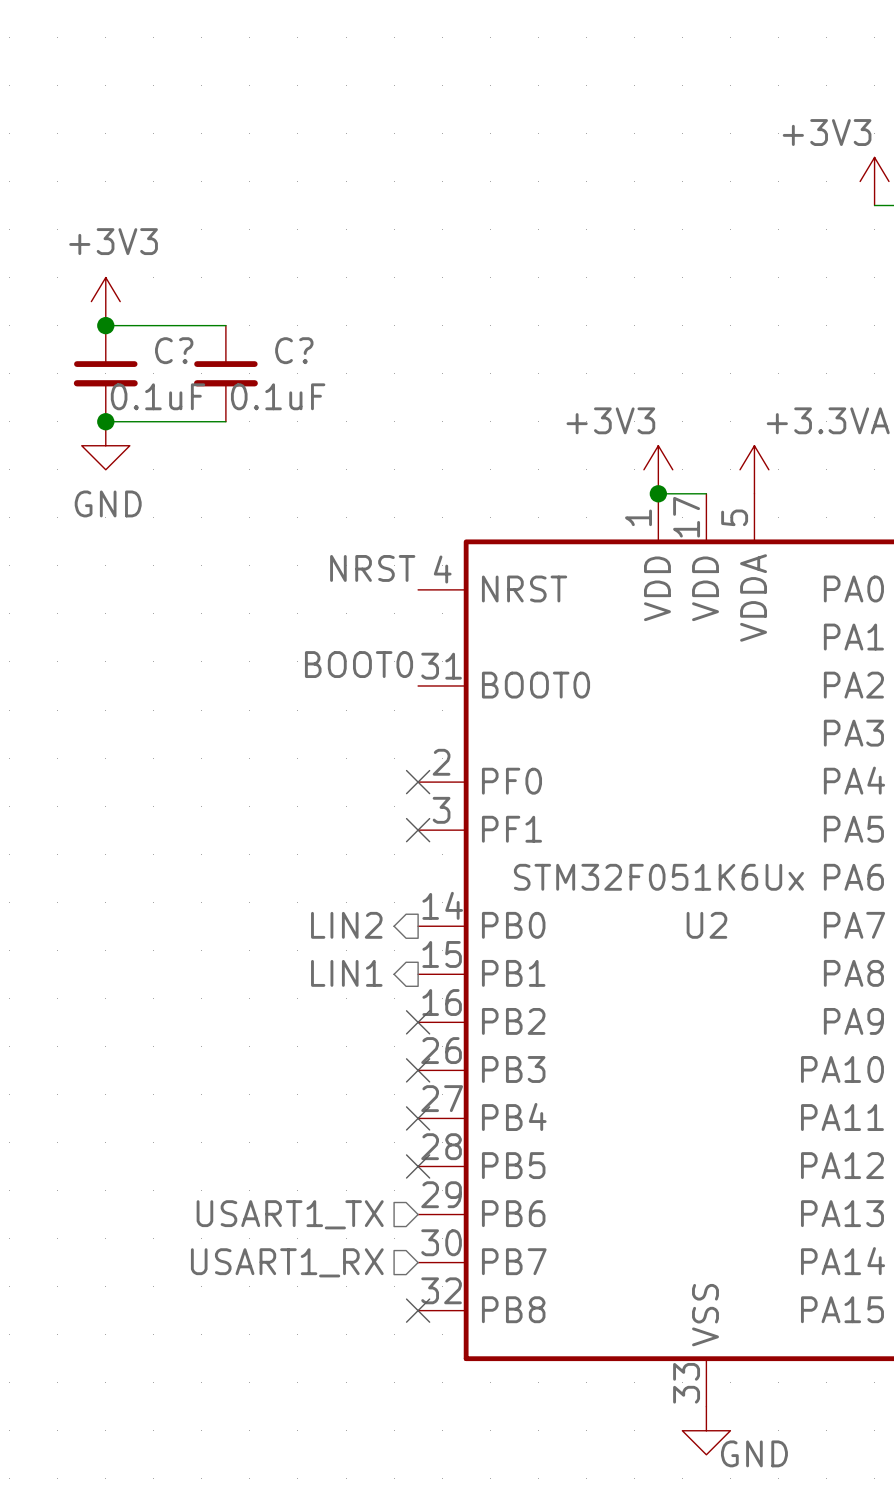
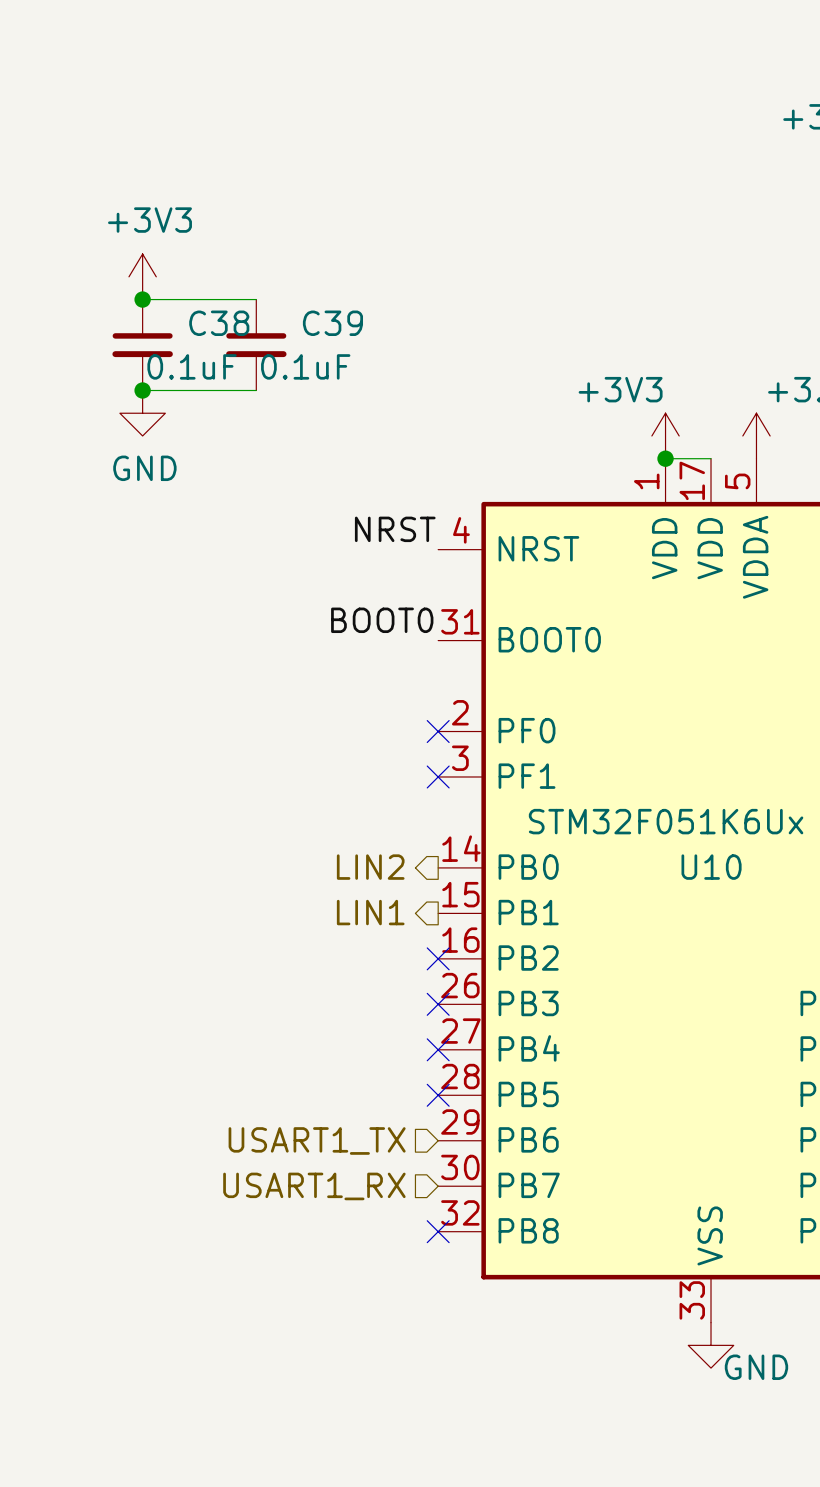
C? name: C? (174, 350) -> C38 (219, 323)
C? name: C? (294, 350) -> C39 (332, 323)
U2 name: U2 (706, 925) -> U10 (711, 867)

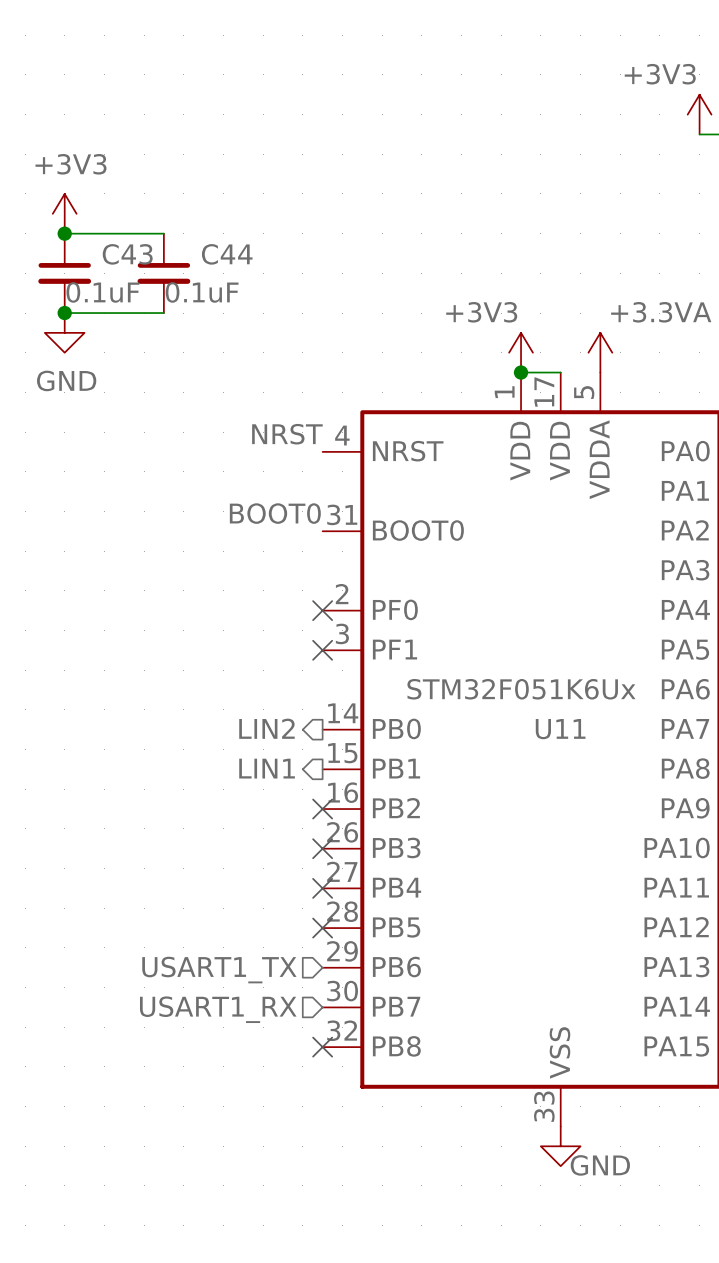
C38 name: C38 (219, 323) -> C43 (127, 254)
C39 name: C39 (332, 323) -> C44 (227, 254)
U10 name: U10 (711, 867) -> U11 (560, 729)

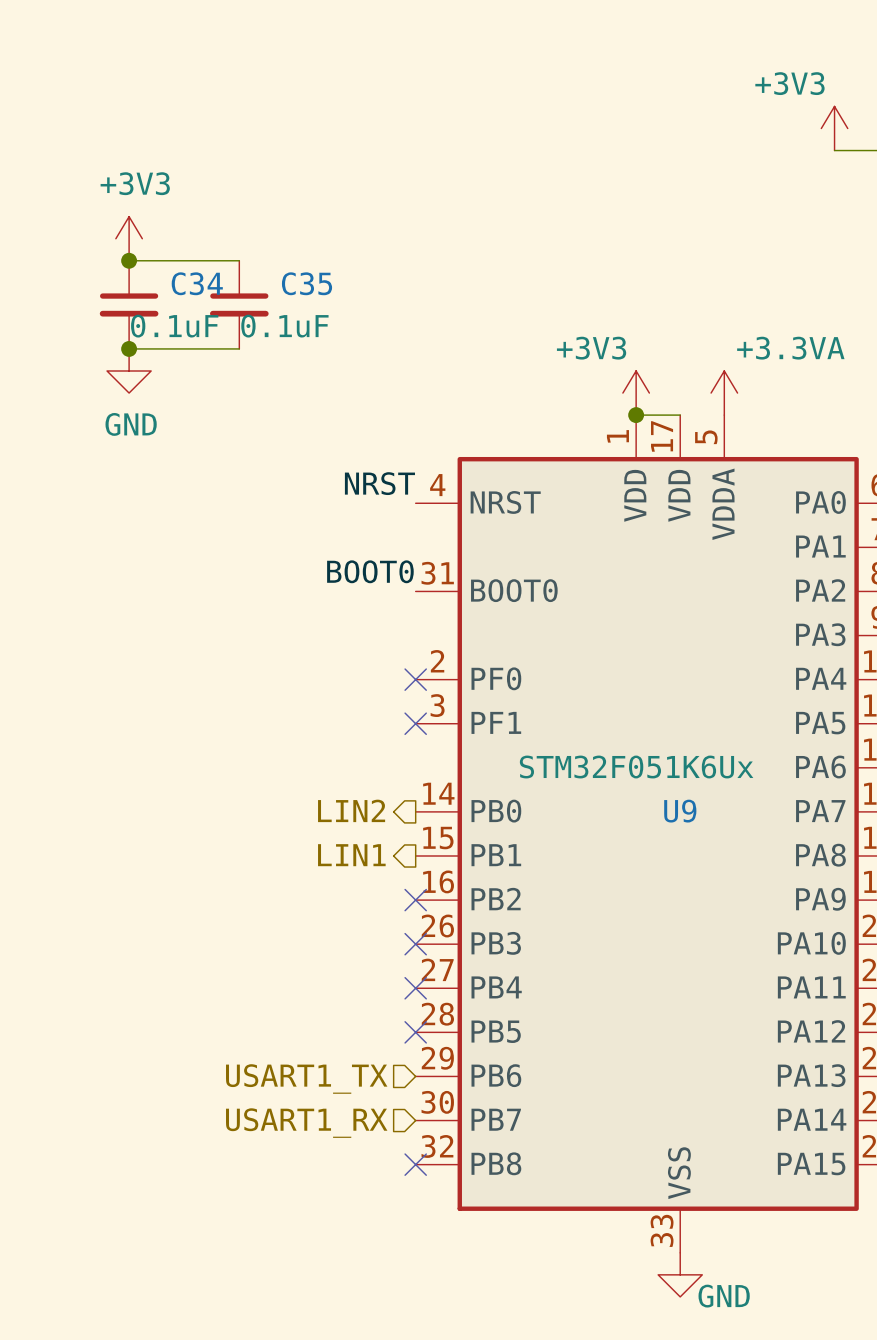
C43 name: C43 (127, 254) -> C34 (197, 283)
C44 name: C44 (227, 254) -> C35 (307, 283)
U11 name: U11 (560, 729) -> U9 (680, 811)

